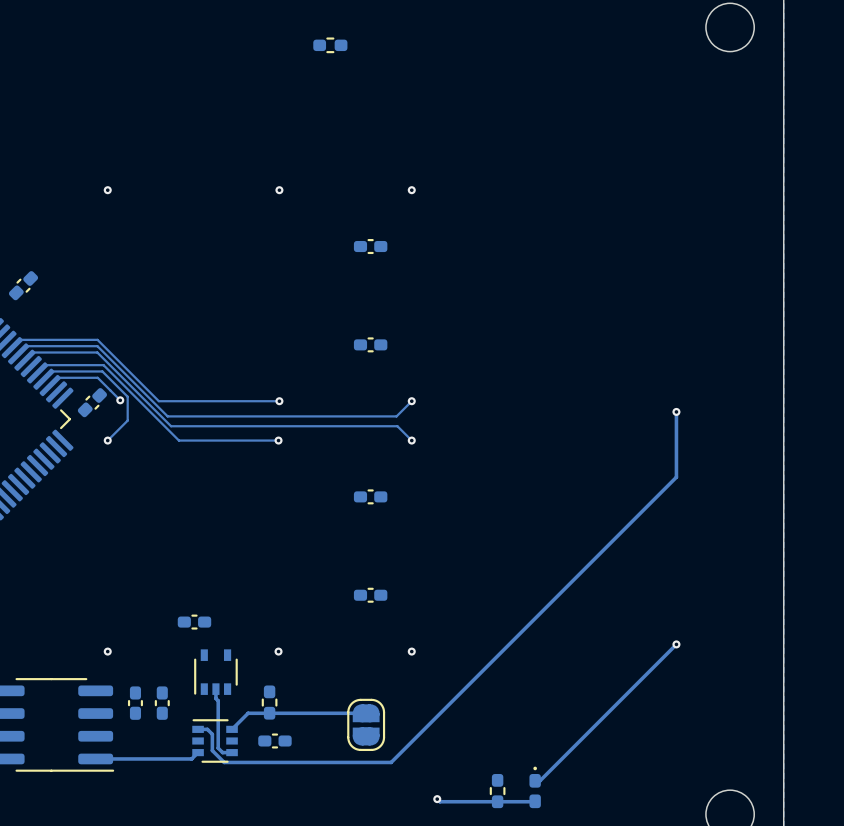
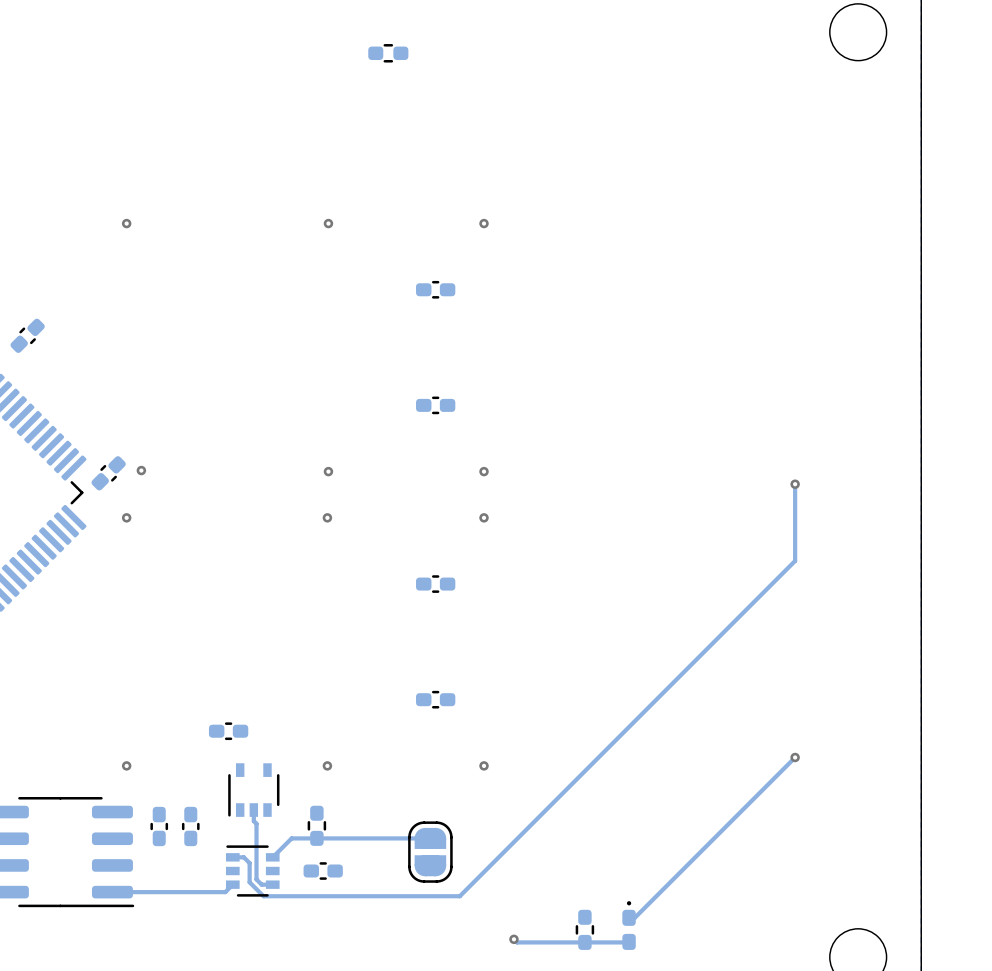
track: (12, 347) (20, 339) (97, 339) (158, 401) (279, 401) -> none
track: (18, 353) (26, 346) (97, 346) (167, 416) (396, 416) (411, 401) -> none
track: (24, 360) (32, 352) (97, 352) (171, 426) (397, 426) (411, 440) -> none
track: (37, 372) (45, 365) (103, 365) (178, 440) (278, 440) -> none
track: (43, 379) (51, 371) (102, 371) (127, 396) (127, 420) (107, 440) -> none
track: (50, 385) (57, 377) (97, 377) (120, 400) -> none

